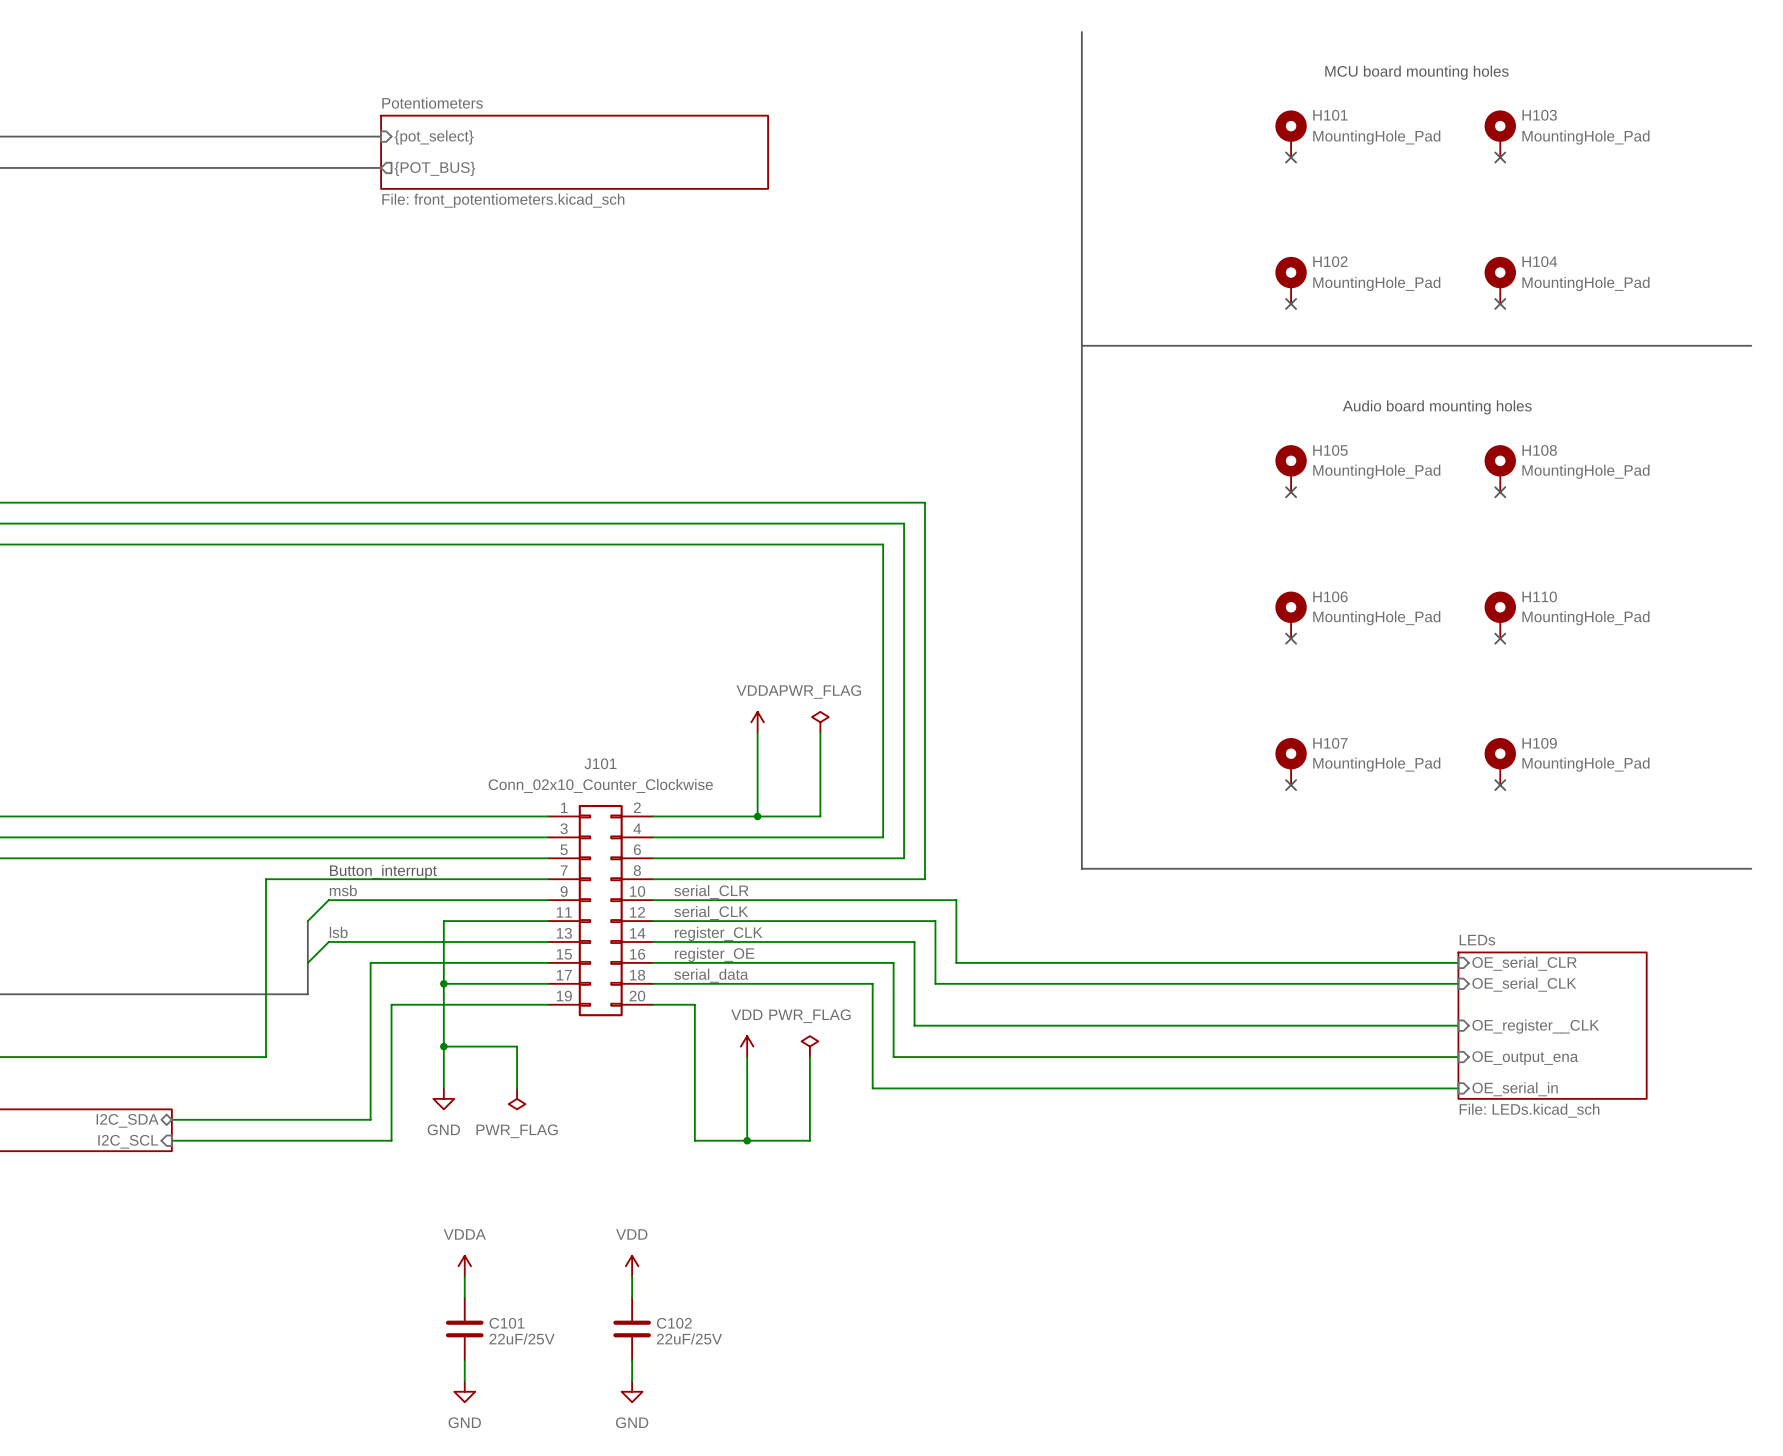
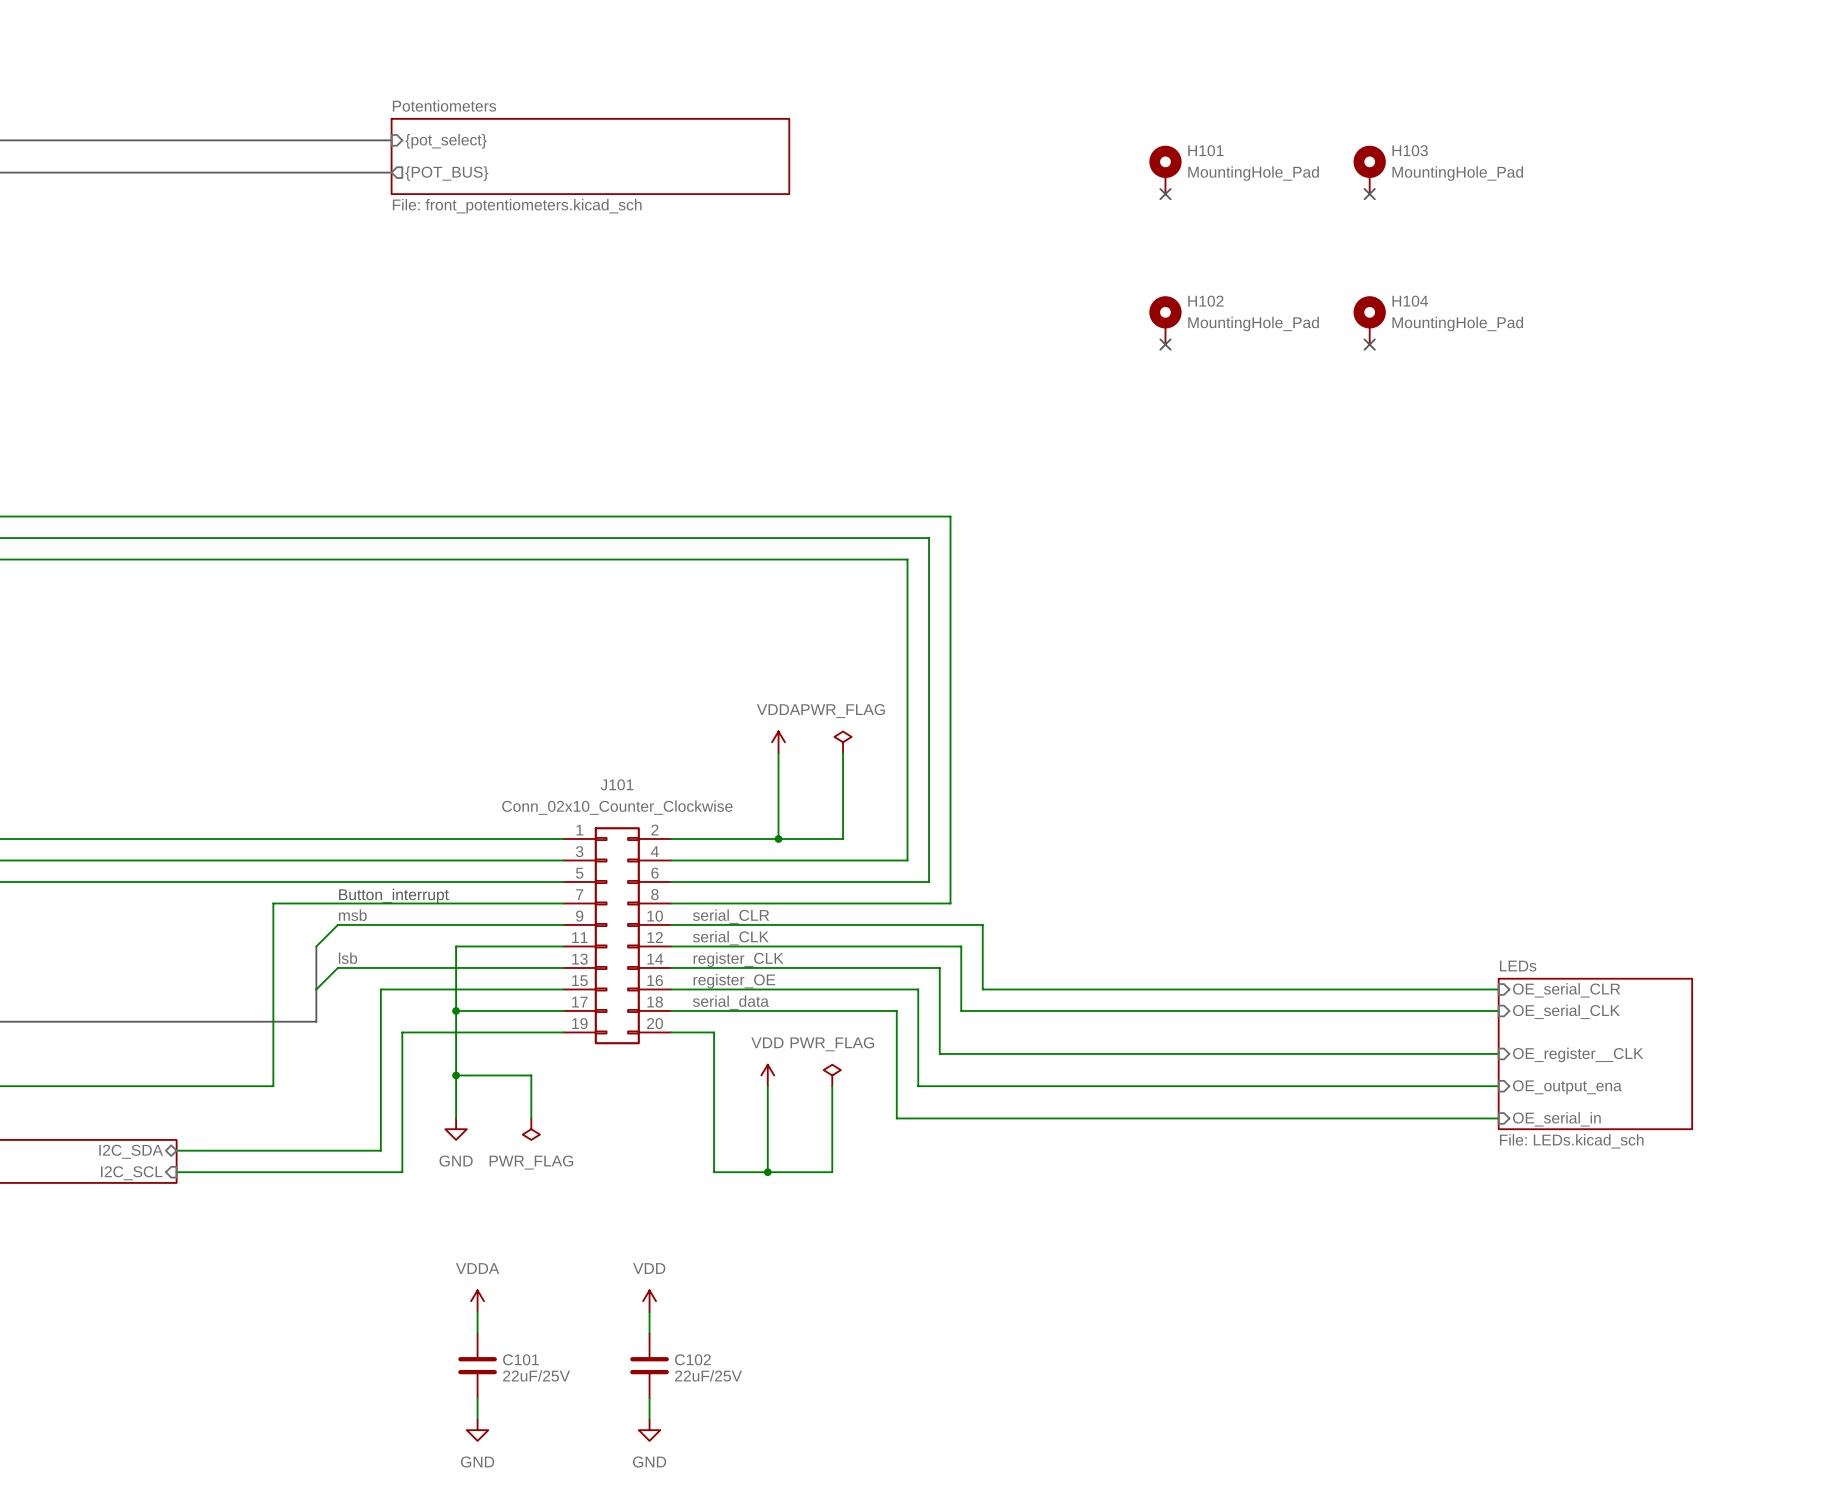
line: (1081, 31) (1081, 868) (1751, 868) -> none
text: MCU board mounting holes (1416, 72) -> none
H101 position: (1291, 133) -> (1165, 169)
H103 position: (1500, 133) -> (1369, 169)
no-connect mark: (1291, 157) -> none
no-connect mark: (1500, 157) -> none
no-connect mark: none -> (1165, 194)
no-connect mark: none -> (1369, 194)
H102 position: (1291, 280) -> (1165, 320)
H104 position: (1500, 280) -> (1369, 320)
no-connect mark: (1291, 303) -> none
no-connect mark: (1500, 303) -> none
no-connect mark: none -> (1165, 344)
no-connect mark: none -> (1369, 344)
line: (1081, 345) (1751, 345) -> none
text: Audio board mounting holes (1437, 407) -> none
H105: MountingHole_Pad (1291, 468) -> none
H108: MountingHole_Pad (1500, 468) -> none
no-connect mark: (1291, 492) -> none
no-connect mark: (1500, 492) -> none
H106: MountingHole_Pad (1291, 615) -> none
H110: MountingHole_Pad (1500, 615) -> none
no-connect mark: (1291, 638) -> none
no-connect mark: (1500, 638) -> none
H107: MountingHole_Pad (1291, 761) -> none
H109: MountingHole_Pad (1500, 761) -> none
no-connect mark: (1291, 785) -> none
no-connect mark: (1500, 785) -> none

